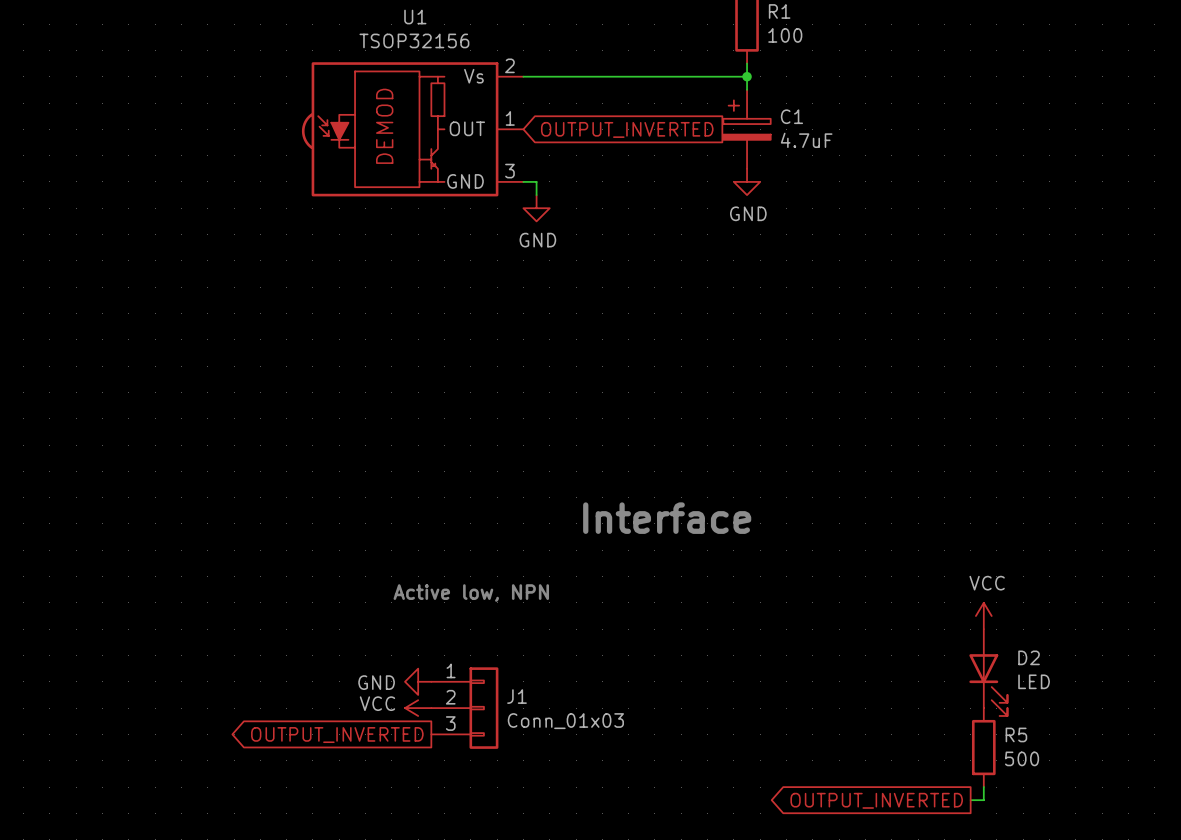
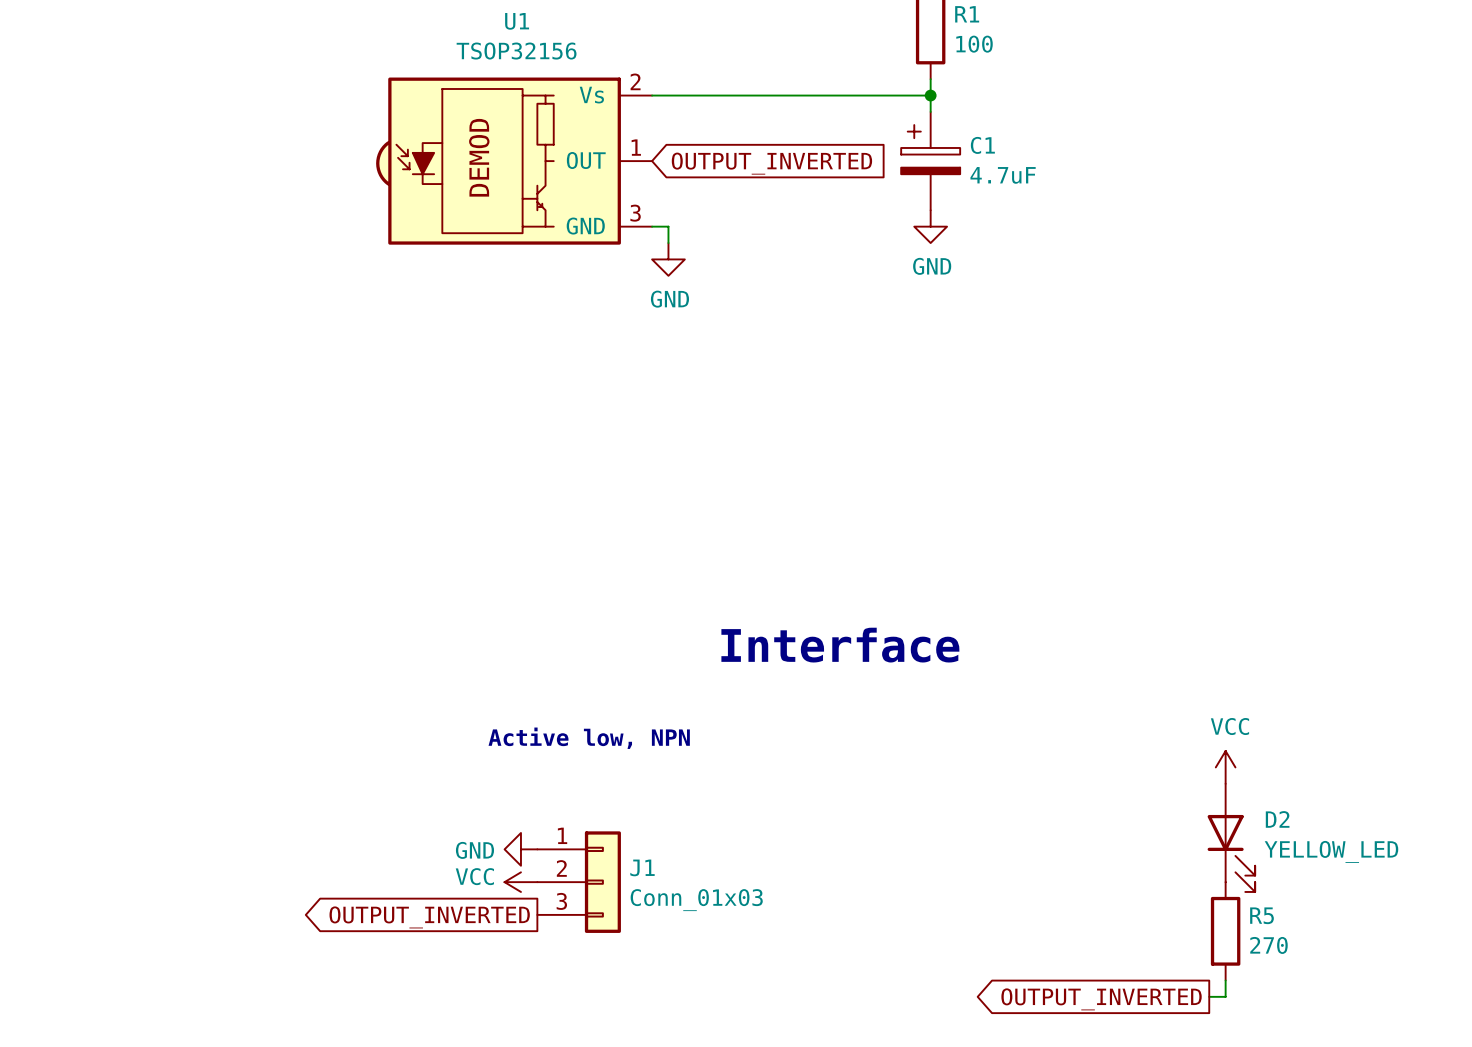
D2 value: LED (1034, 681) -> YELLOW_LED (1331, 851)
R5 value: 500 (1022, 758) -> 270 (1268, 945)

